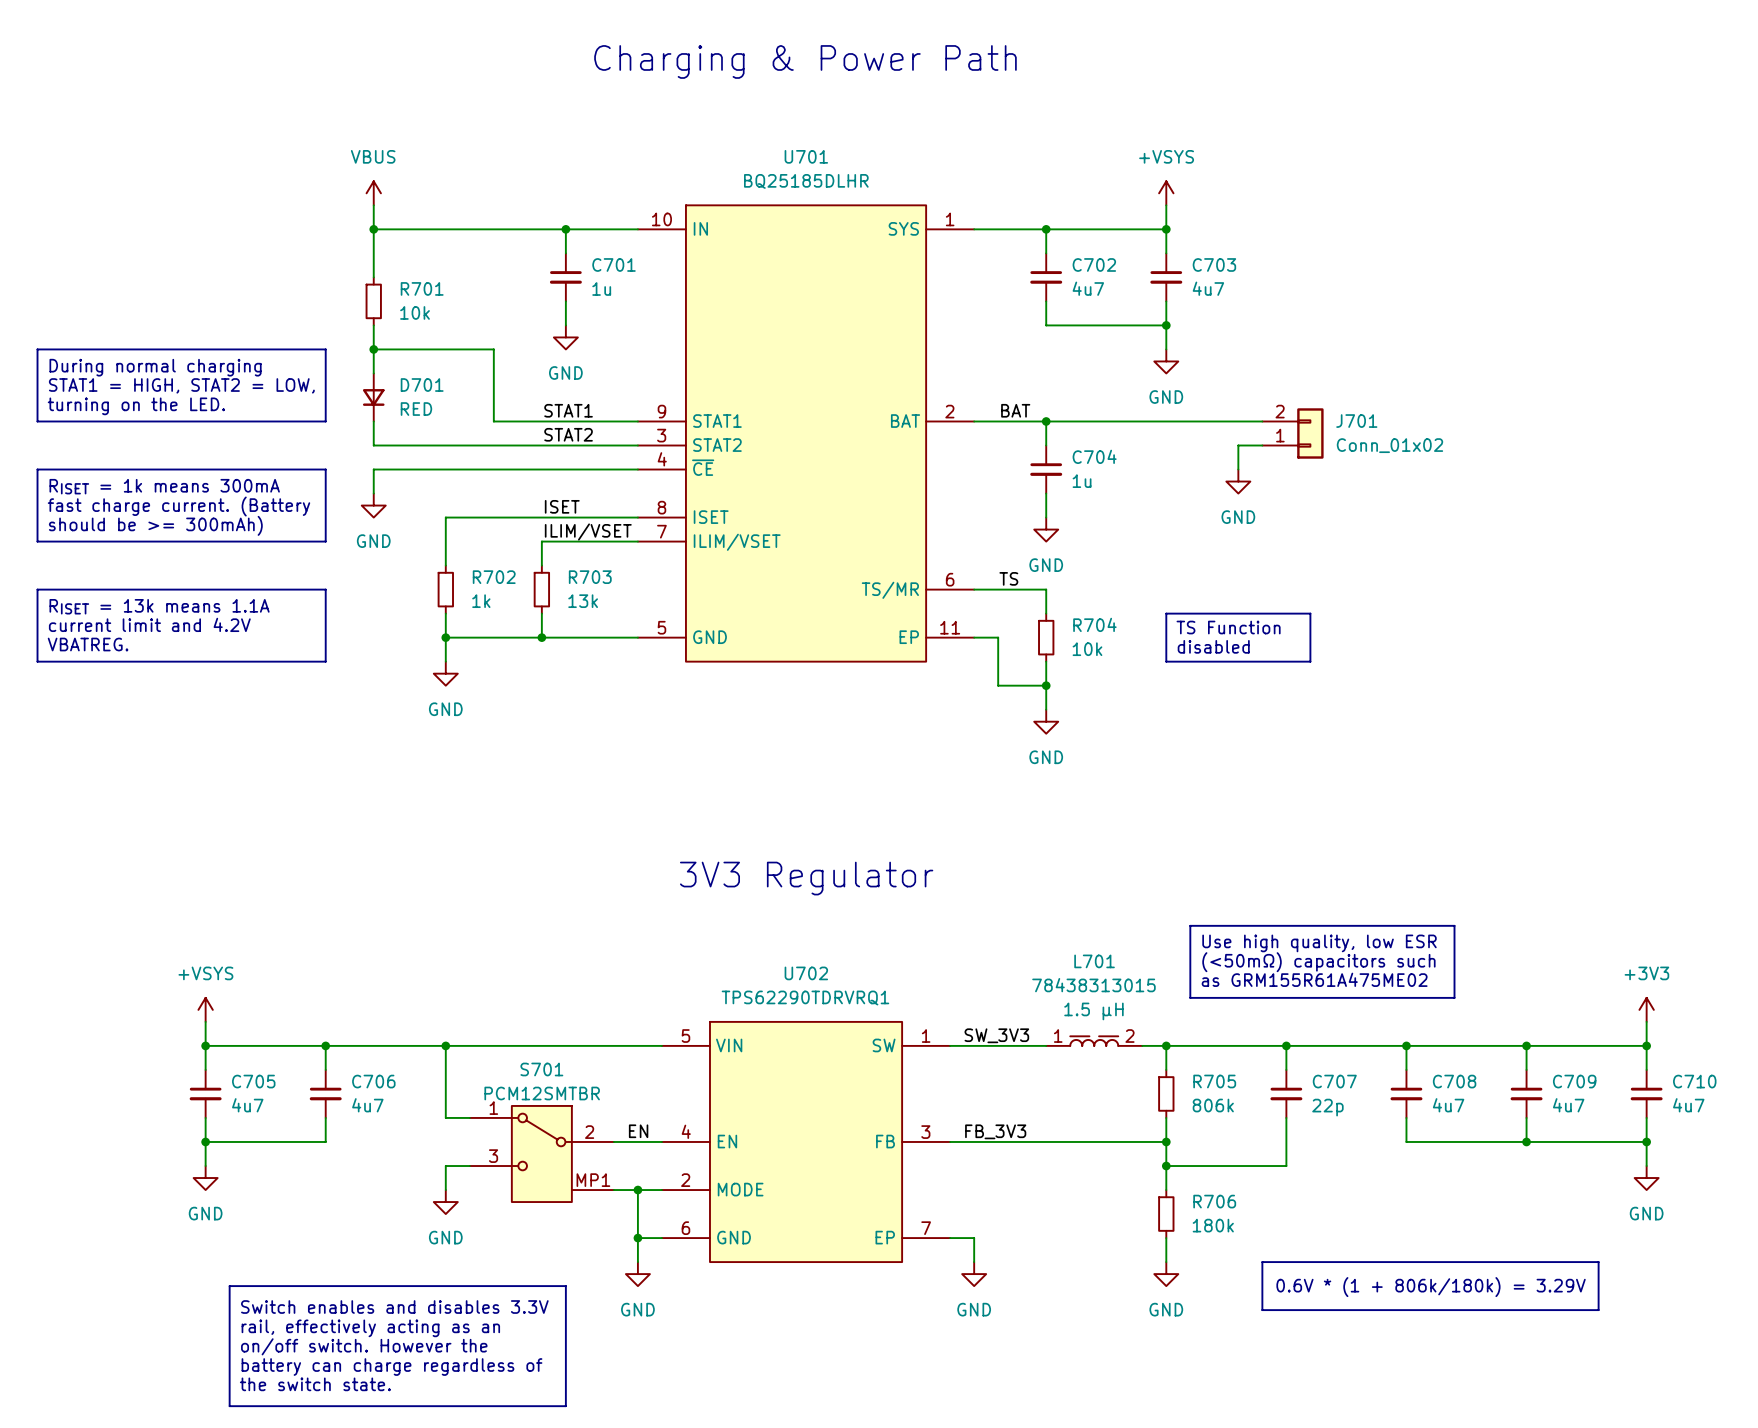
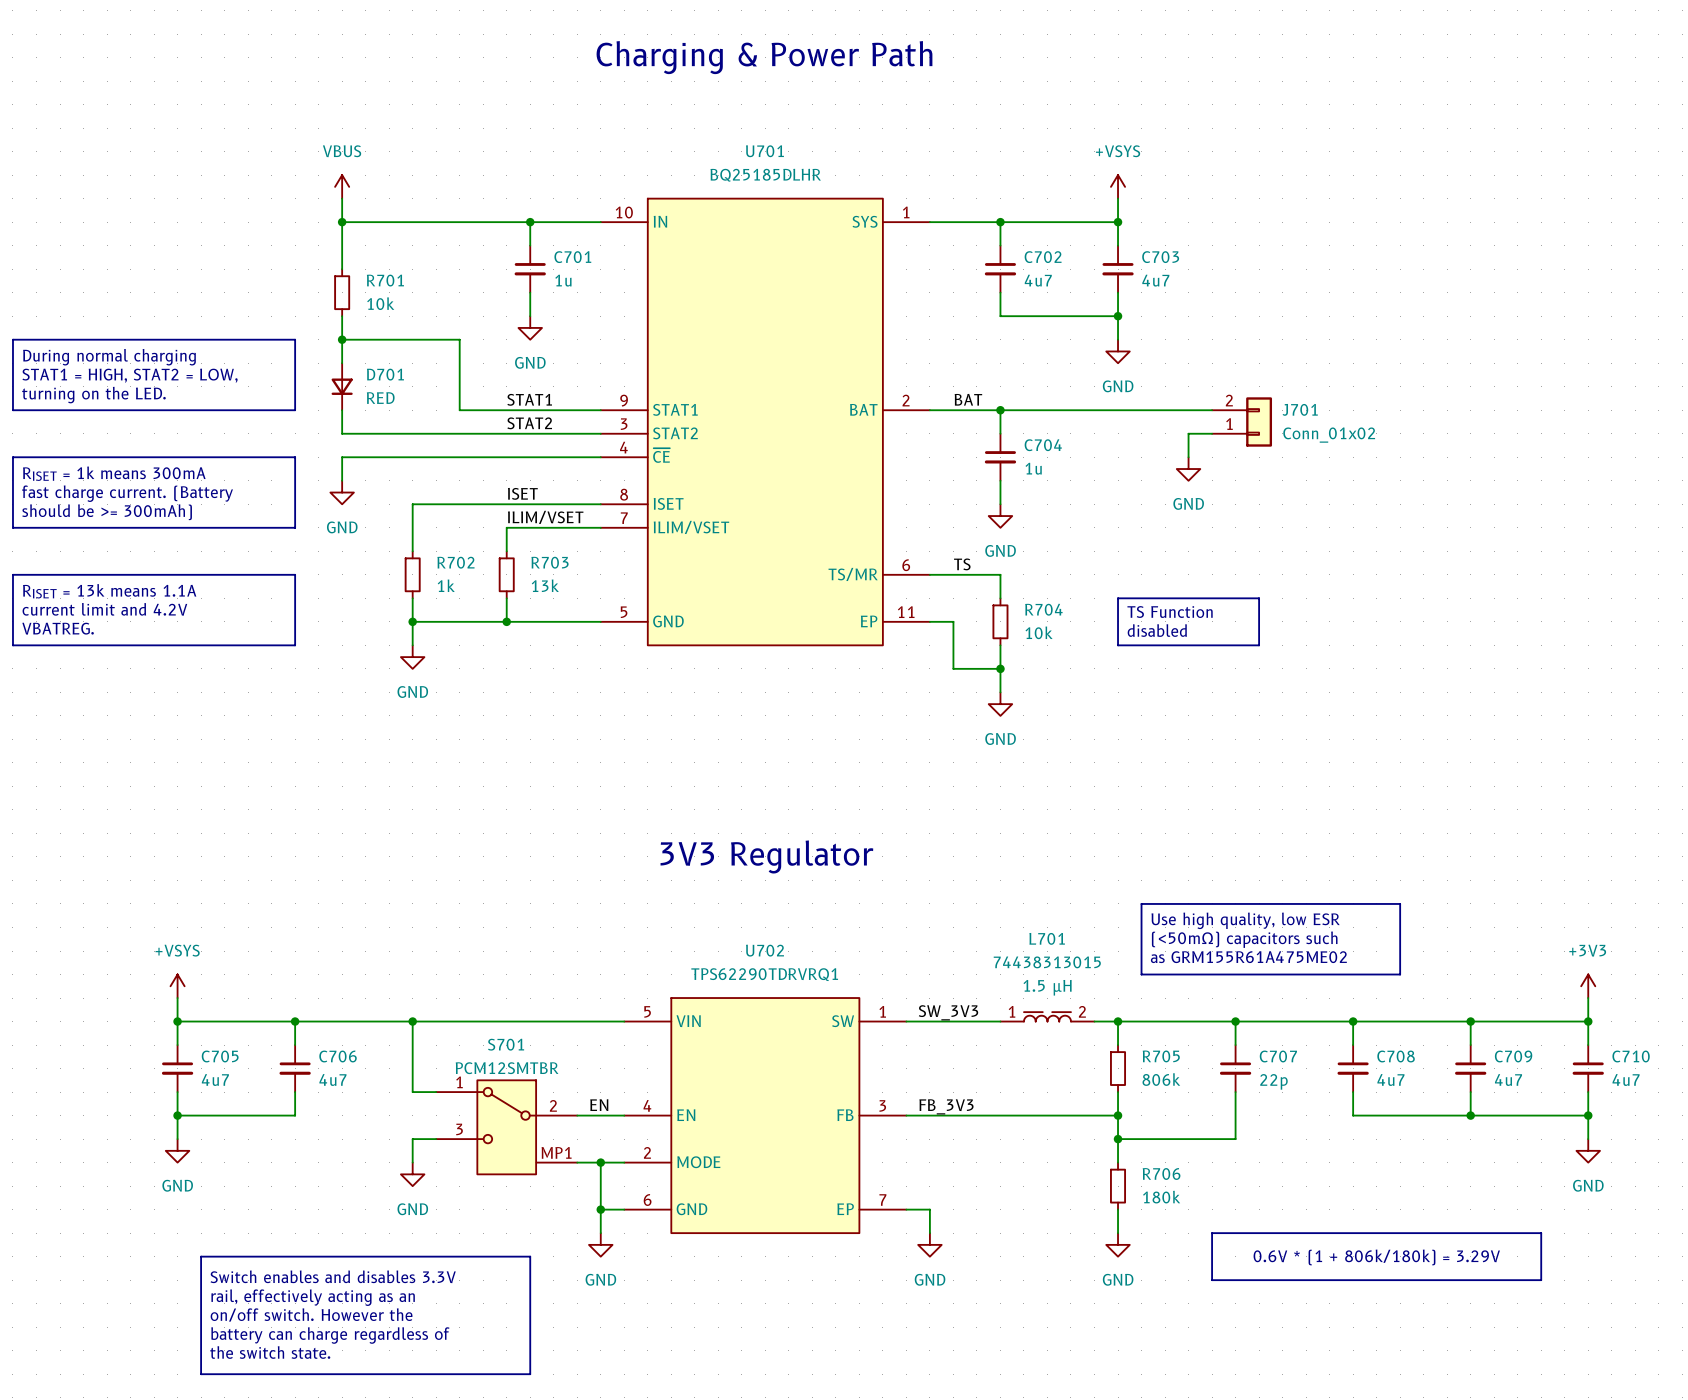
L701 value: 78438313015 (1093, 985) -> 74438313015 (1047, 962)

